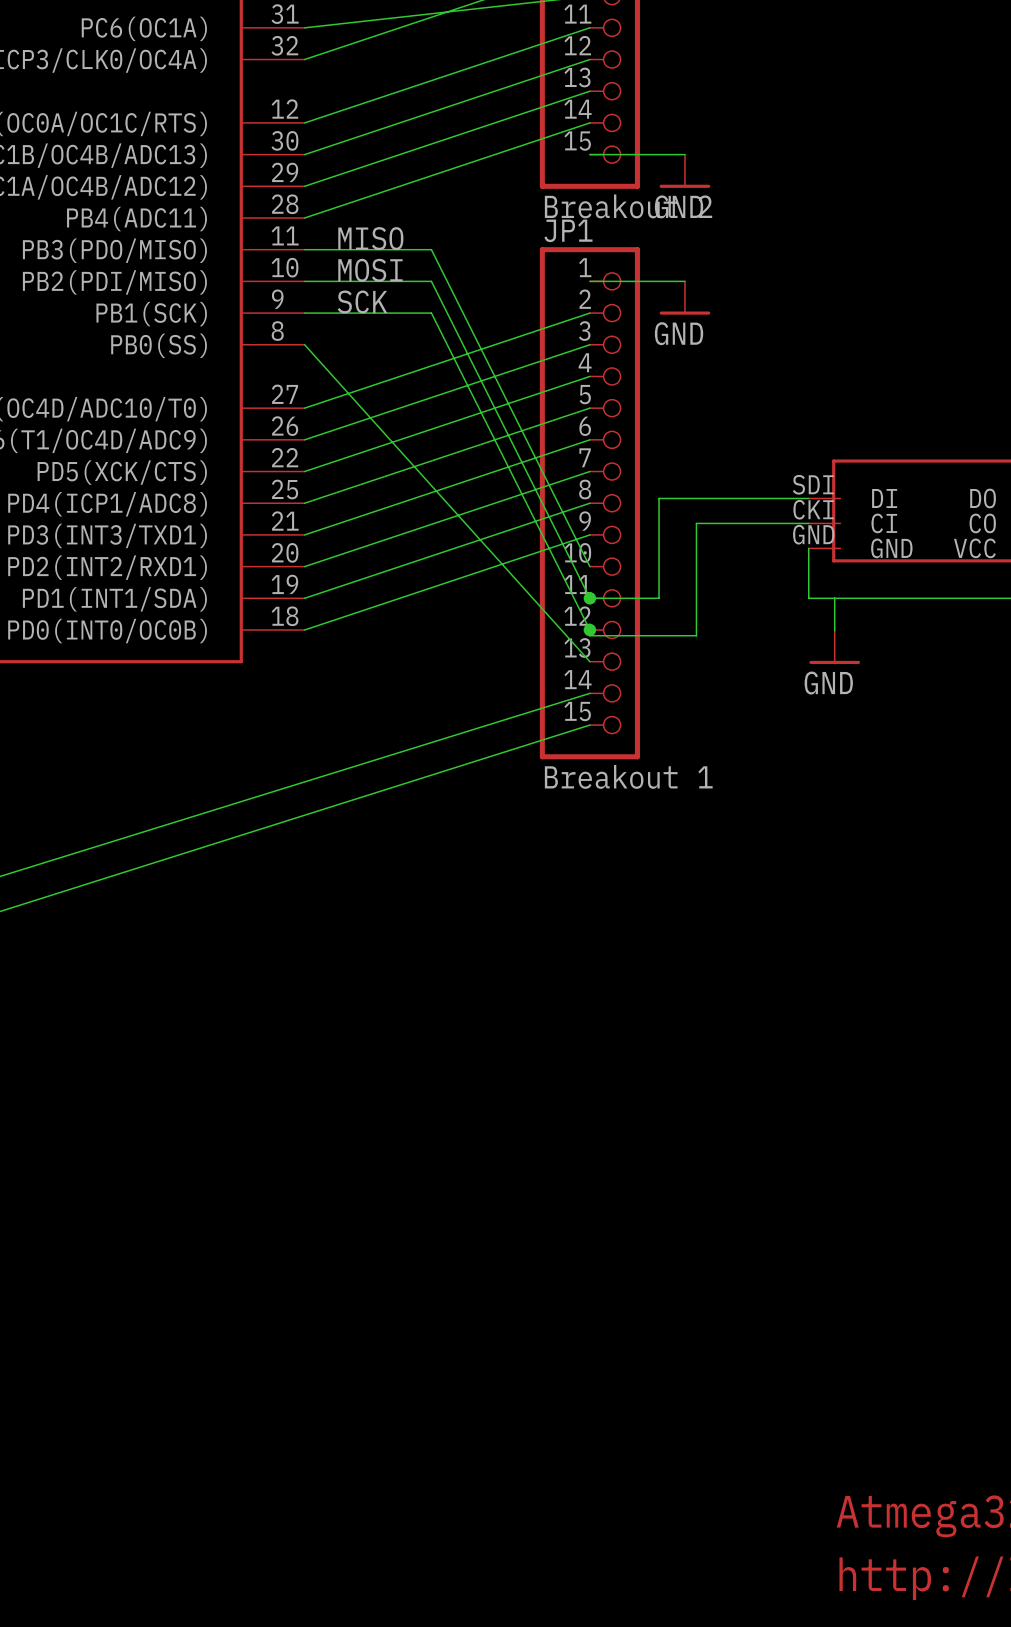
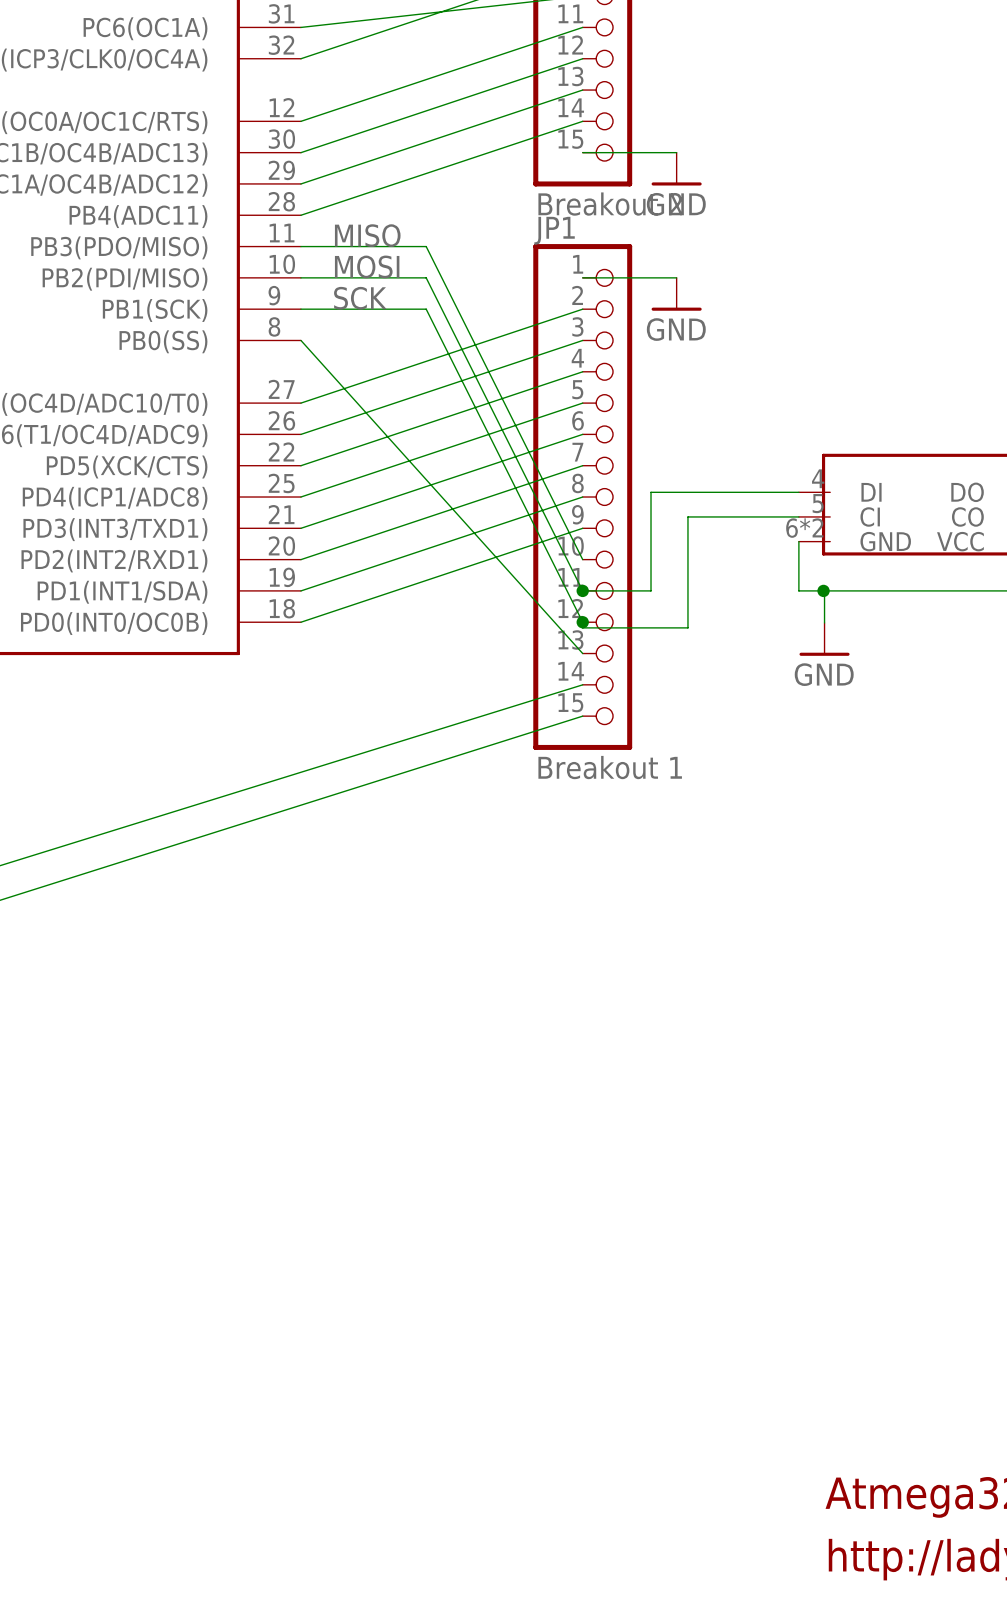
part pin number: SDI (813, 484) -> 4 (818, 478)
part pin number: CKI (813, 509) -> 5 (818, 503)
part pin number: GND (813, 534) -> 6*2 (804, 528)
junction: none -> (823, 590)

